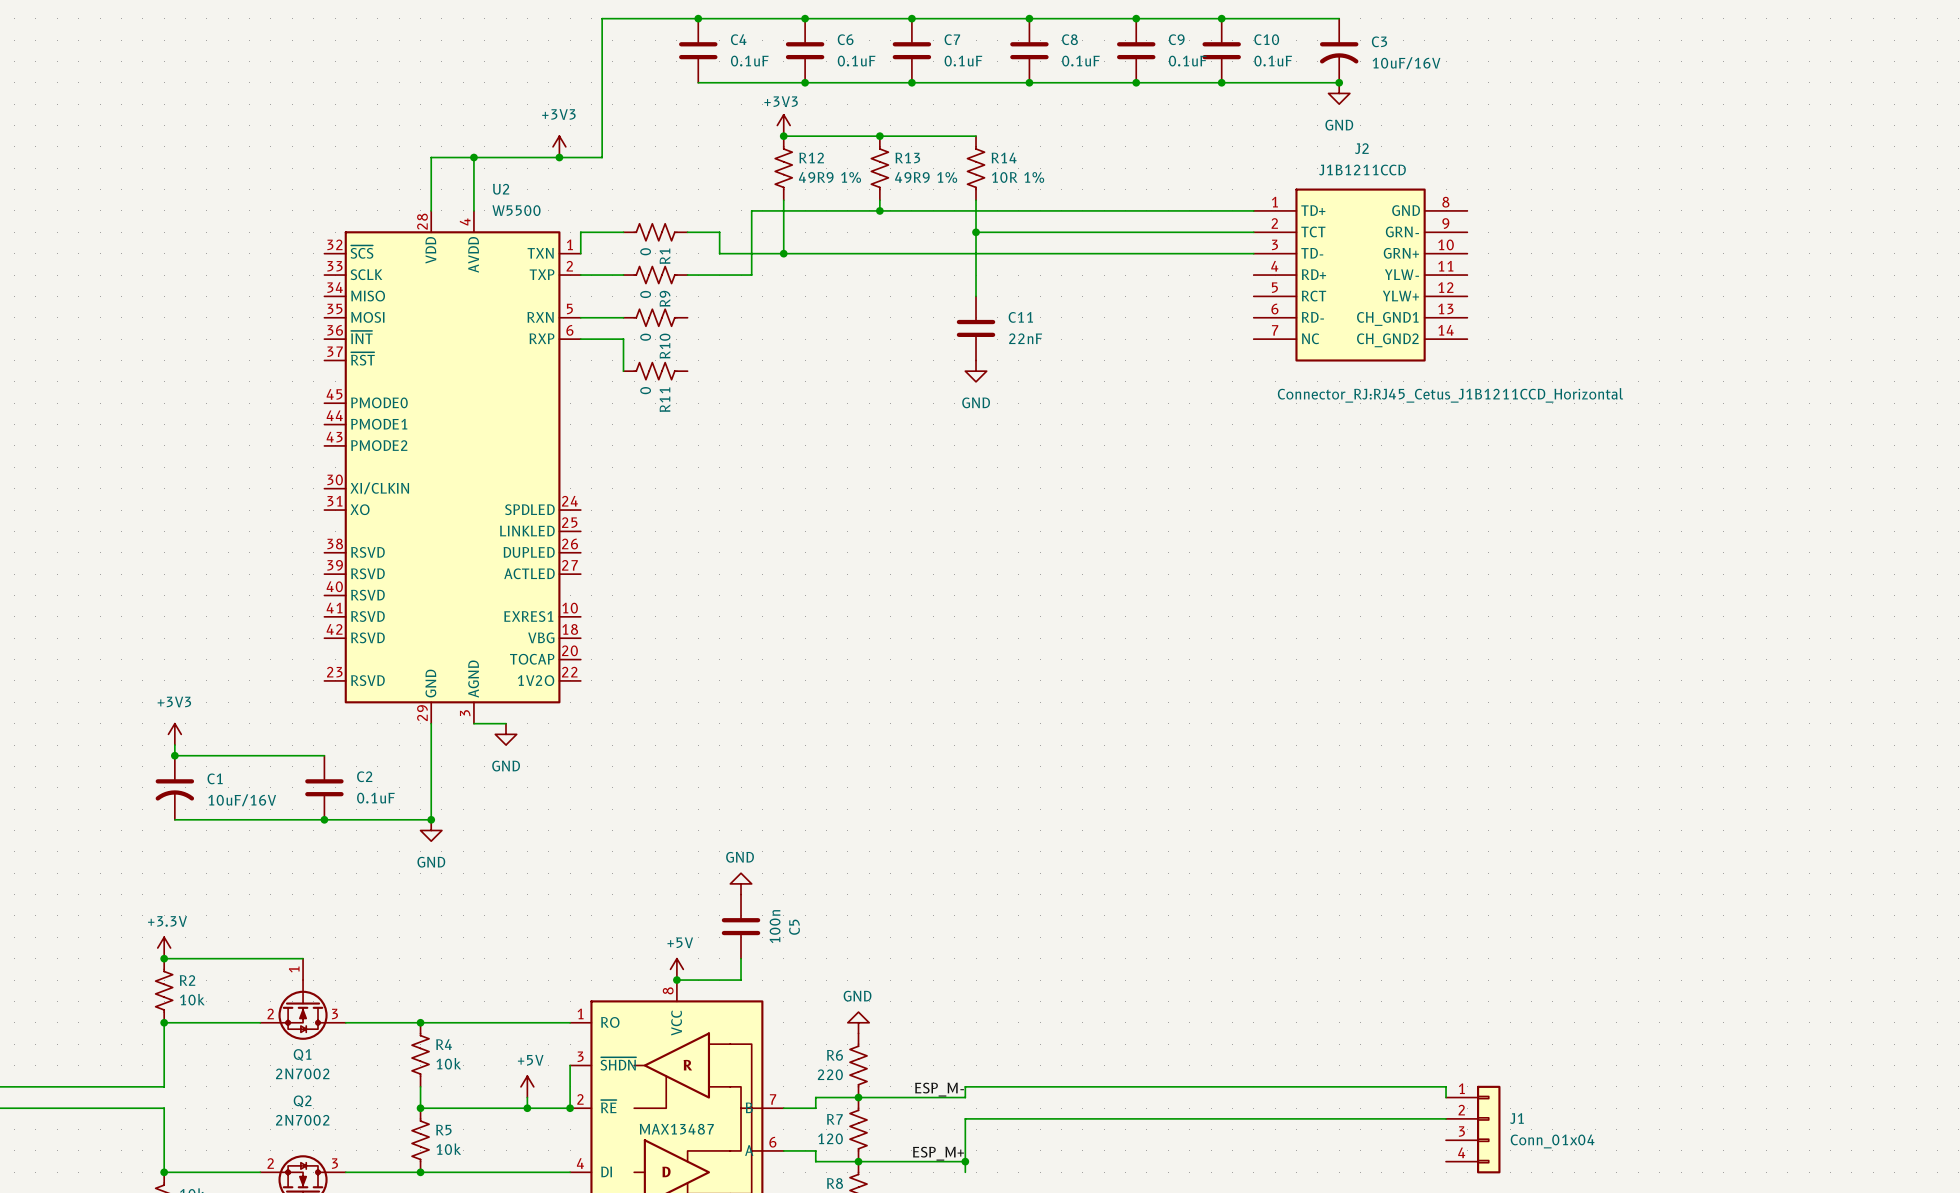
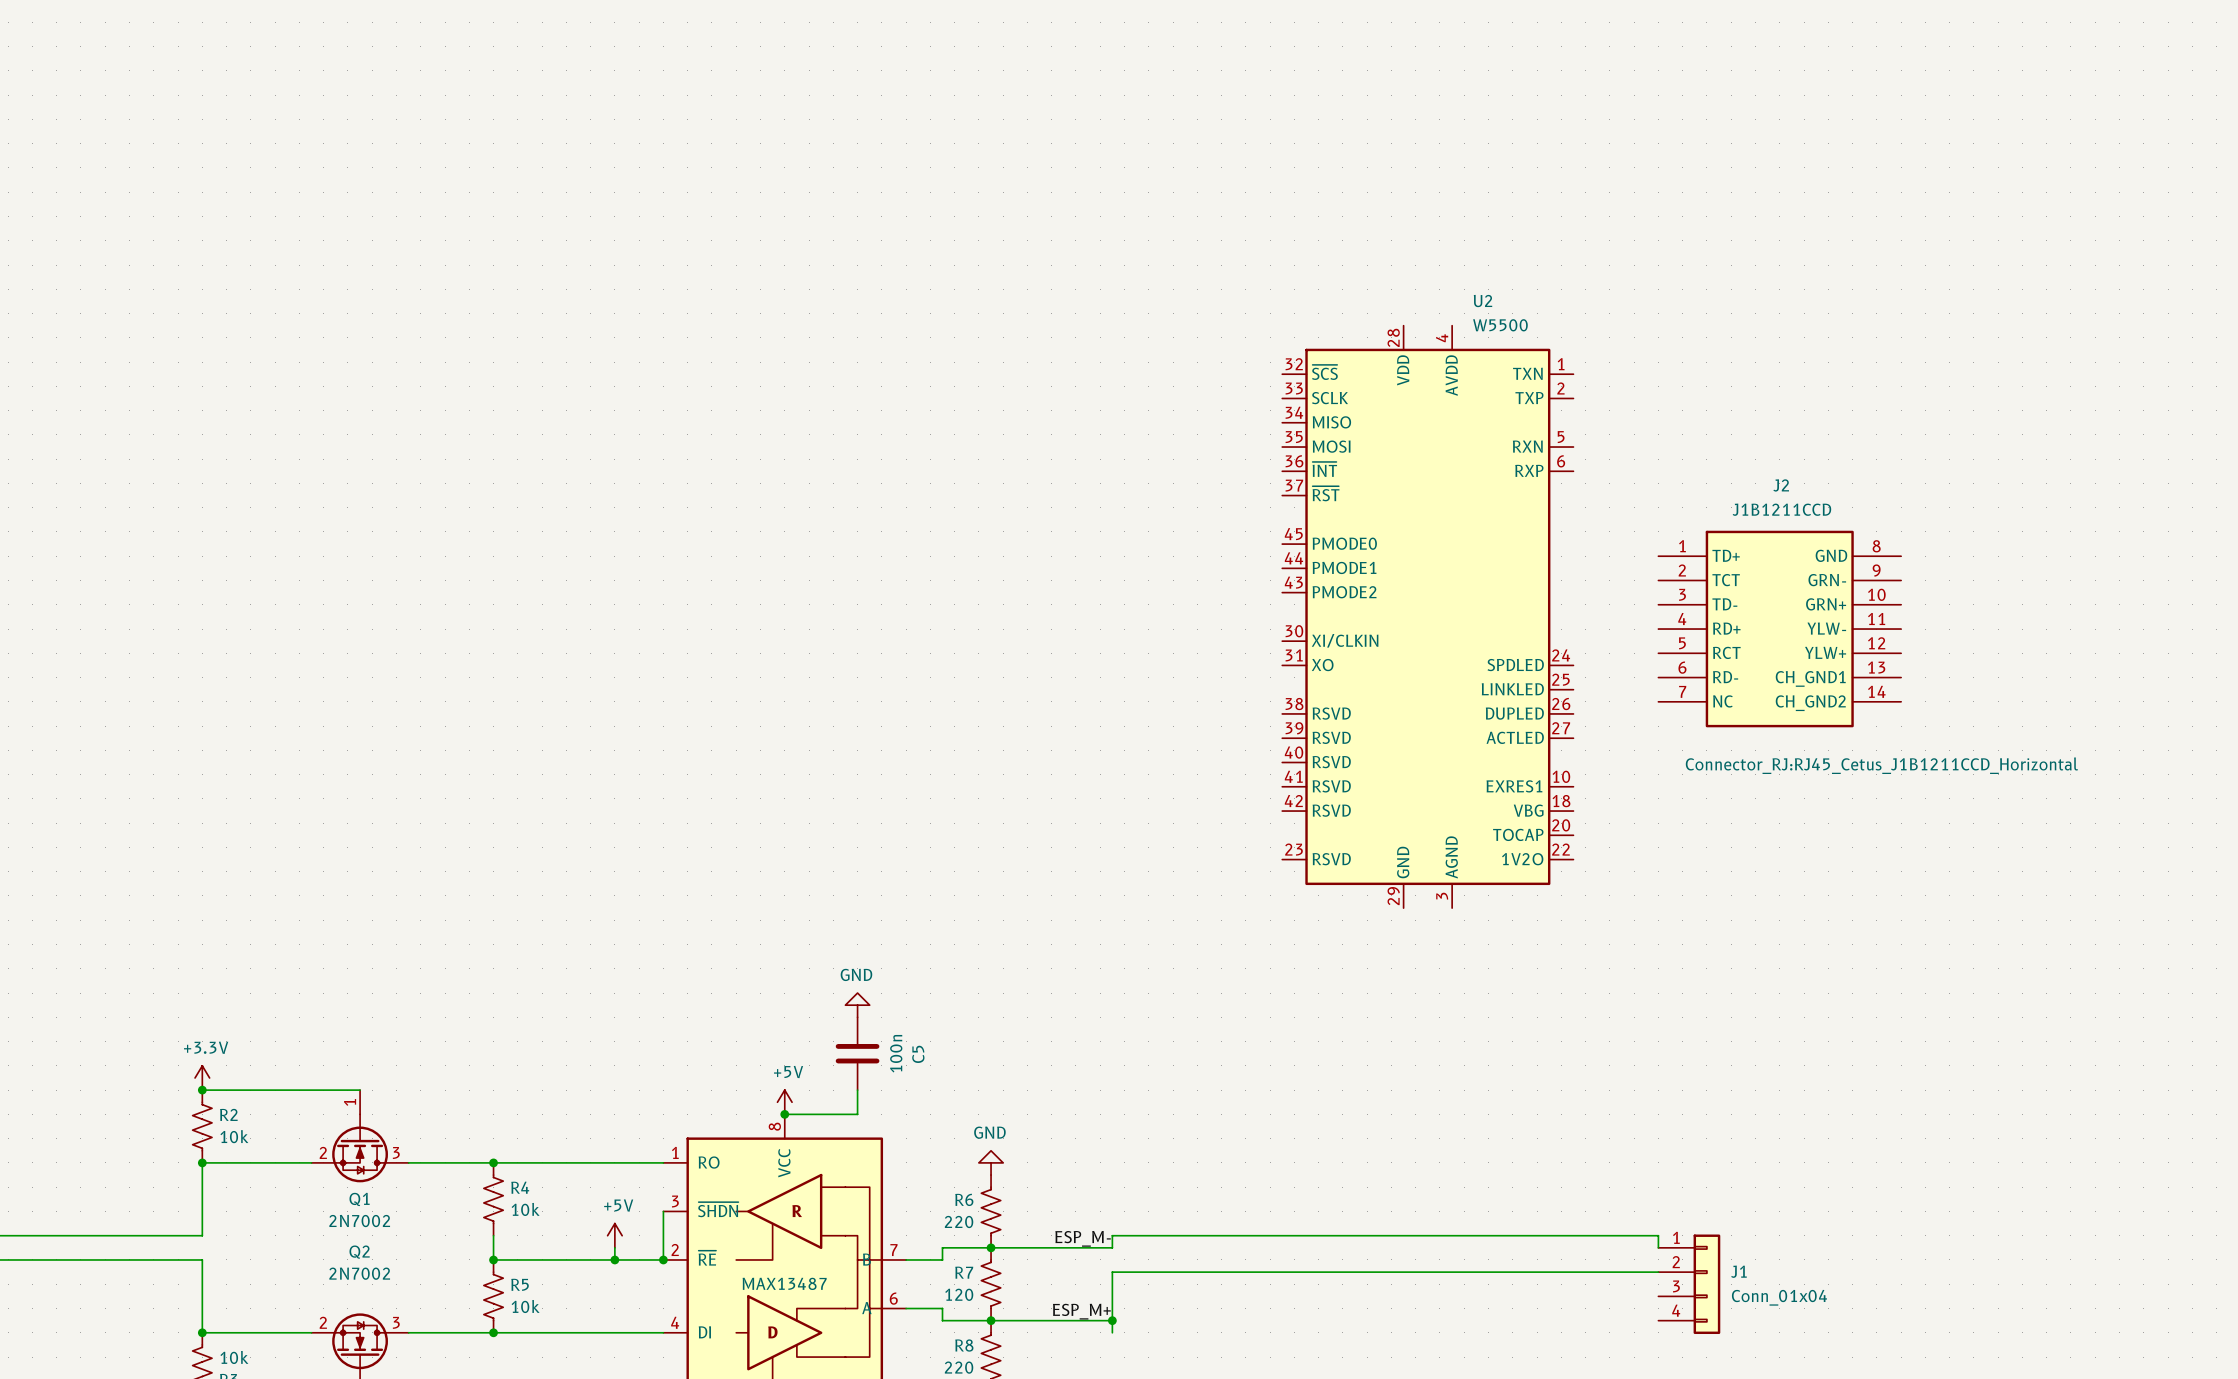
junction: (698, 18) -> none
junction: (805, 18) -> none
junction: (911, 18) -> none
junction: (1029, 18) -> none
junction: (1136, 18) -> none
junction: (1221, 18) -> none
wire: (1339, 18) (602, 18) (602, 157) (431, 157) (431, 210) -> none
C4: 0.1uF (698, 50) -> none
C6: 0.1uF (805, 50) -> none
C7: 0.1uF (911, 50) -> none
C8: 0.1uF (1029, 50) -> none
C9: 0.1uF (1136, 50) -> none
C10: 0.1uF (1221, 50) -> none
C3: 10uF/16V (1339, 50) -> none
wire: (698, 82) (1339, 82) -> none
junction: (805, 82) -> none
junction: (911, 82) -> none
junction: (1029, 82) -> none
junction: (1136, 82) -> none
junction: (1221, 82) -> none
junction: (1339, 82) -> none
power symbol: GND (1339, 93) -> none
power symbol: +3V3 (783, 125) -> none
wire: (783, 136) (976, 136) -> none
junction: (783, 136) -> none
junction: (879, 136) -> none
power symbol: +3V3 (559, 146) -> none
wire: (473, 157) (473, 210) -> none
junction: (473, 157) -> none
junction: (559, 157) -> none
R12: 49R9 1% (783, 168) -> none
R13: 49R9 1% (879, 168) -> none
R14: 10R 1% (976, 168) -> none
wire: (783, 200) (783, 253) -> none
wire: (879, 200) (879, 210) -> none
wire: (976, 200) (976, 296) -> none
junction: (879, 210) -> none
wire: (1253, 210) (751, 210) (751, 275) (687, 275) -> none
wire: (623, 232) (580, 232) (580, 253) -> none
R1: 0 (655, 232) -> none
wire: (687, 232) (719, 232) (719, 253) (1253, 253) -> none
wire: (976, 232) (1253, 232) -> none
junction: (976, 232) -> none
junction: (783, 253) -> none
wire: (580, 275) (623, 275) -> none
R9: 0 (655, 275) -> none
J2 position: (1360, 275) -> (1779, 629)
wire: (580, 317) (623, 317) -> none
R10: 0 (655, 317) -> none
C11: 22nF (976, 328) -> none
wire: (580, 339) (623, 339) (623, 371) -> none
R11: 0 (655, 371) -> none
power symbol: GND (976, 371) -> none
U2 position: (452, 467) -> (1427, 616)
wire: (431, 723) (431, 819) (174, 819) -> none
wire: (473, 723) (506, 723) -> none
power symbol: +3V3 (174, 734) -> none
power symbol: GND (506, 734) -> none
wire: (174, 745) (174, 755) (324, 755) -> none
junction: (174, 755) -> none
C1: 10uF/16V (174, 787) -> none
C2: 0.1uF (324, 787) -> none
junction: (324, 819) -> none
junction: (431, 819) -> none
power symbol: GND (431, 830) -> none

